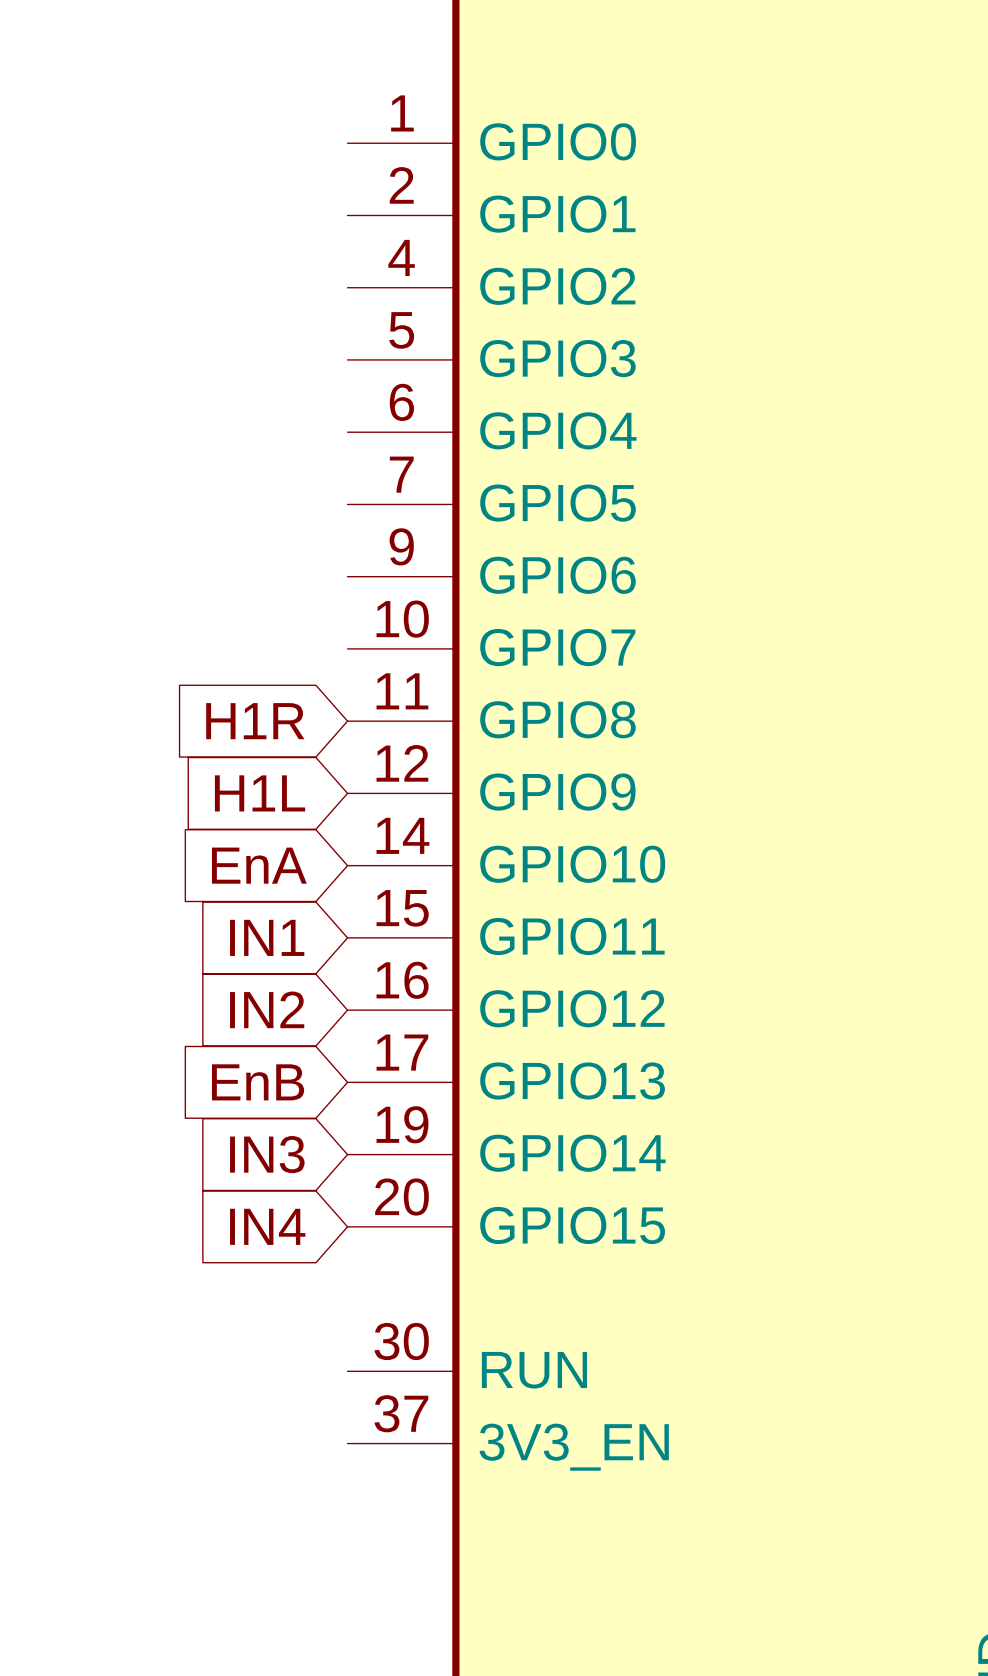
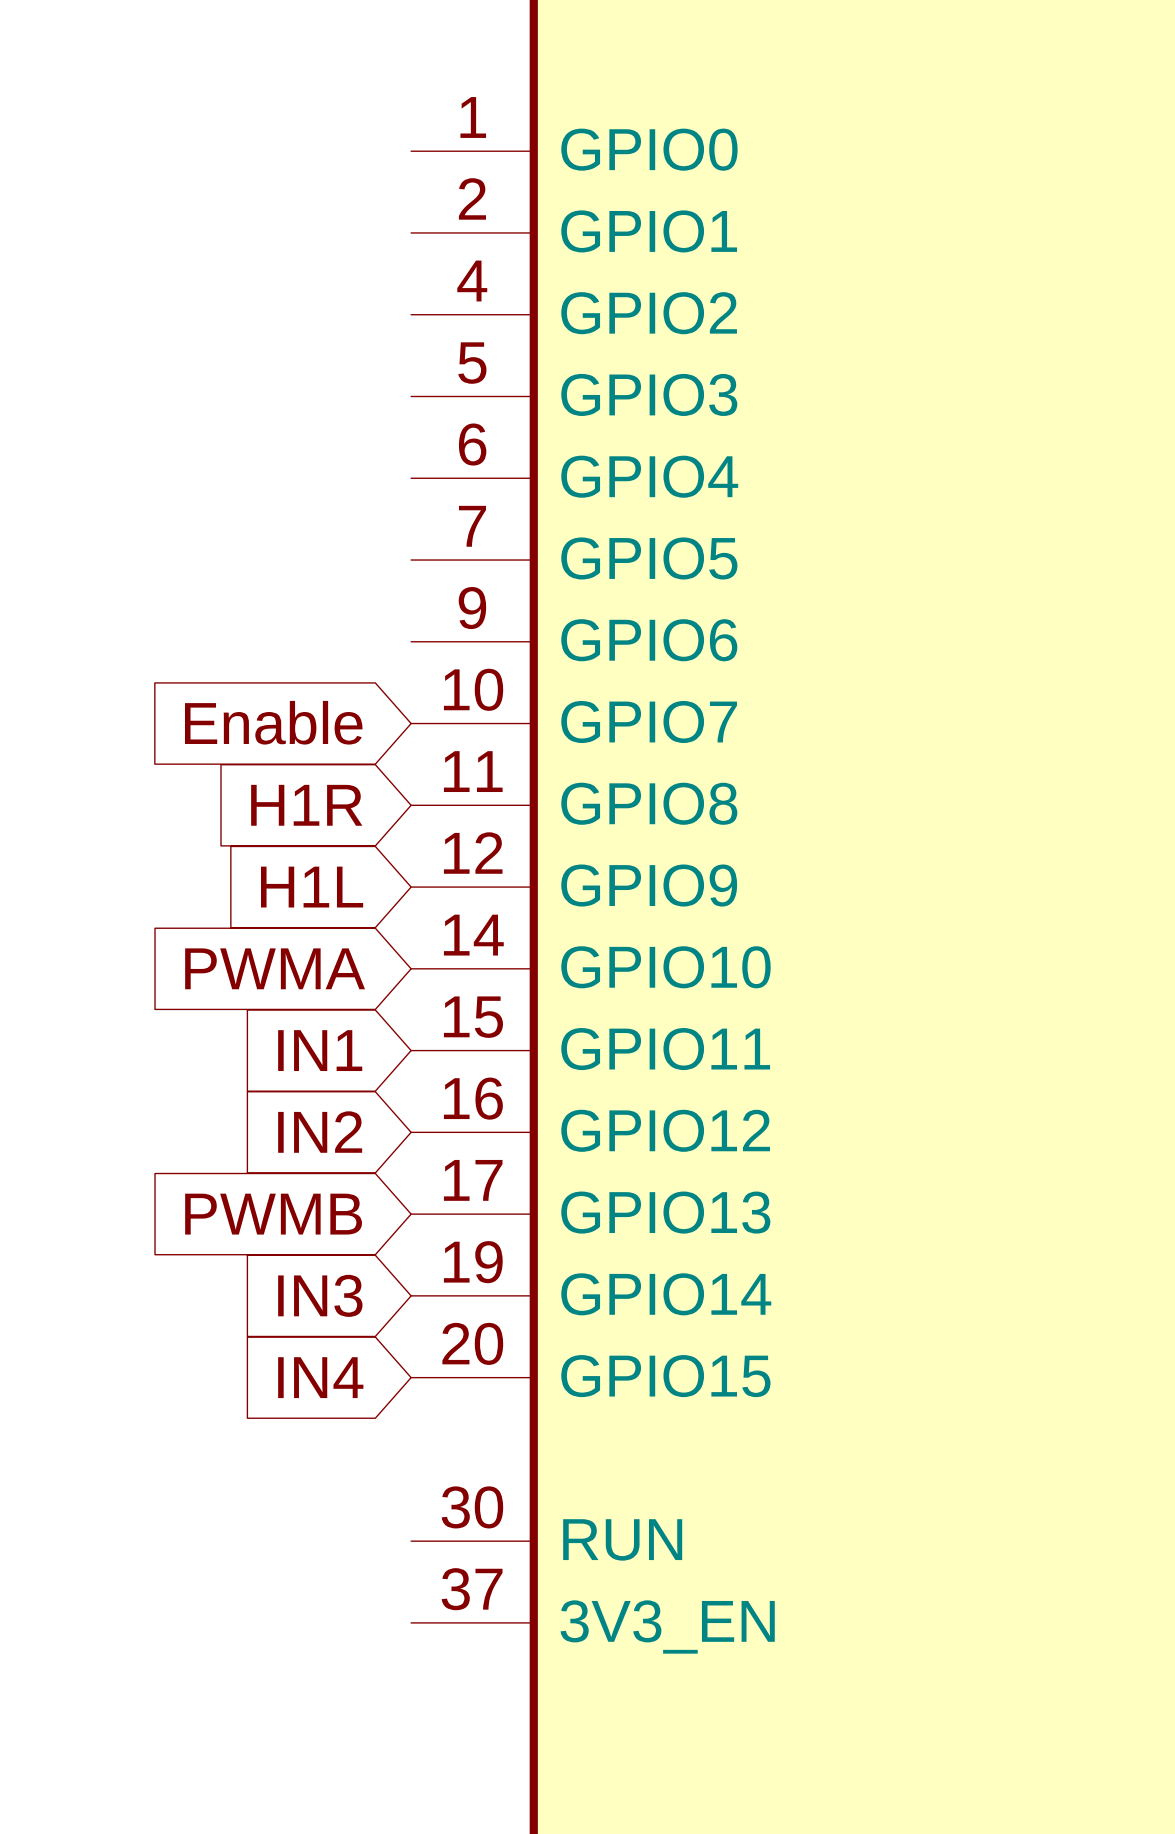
global label: none -> Enable (273, 722)
global label: EnA (259, 865) -> PWMA (275, 968)
global label: EnB (258, 1082) -> PWMB (273, 1214)

